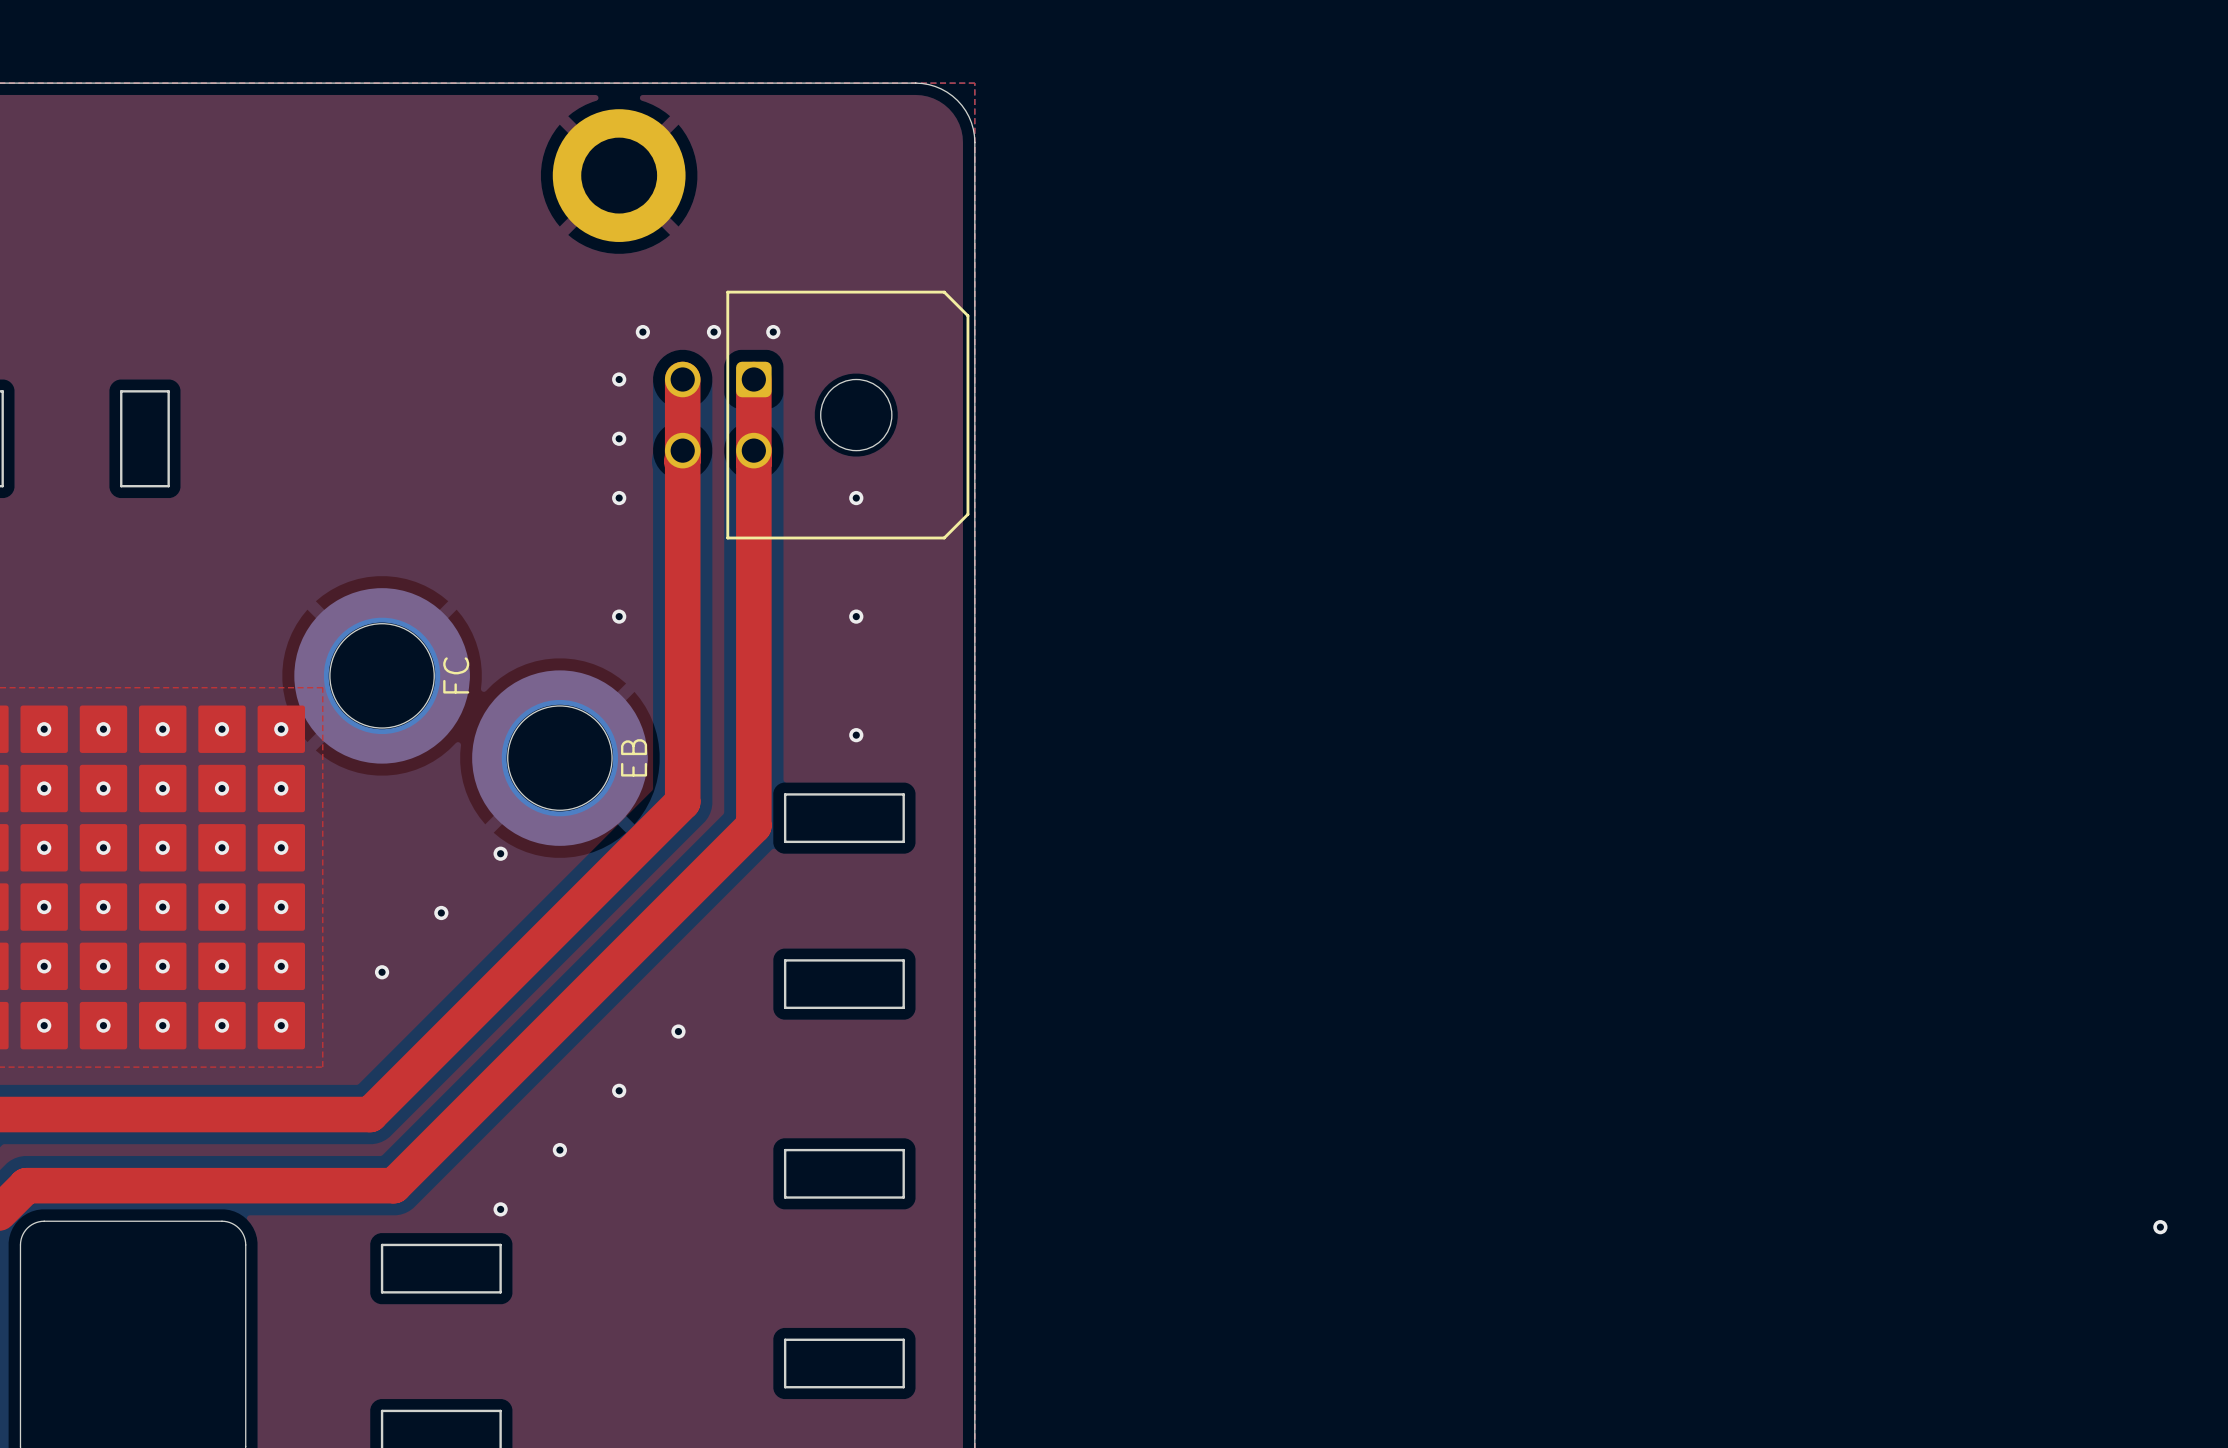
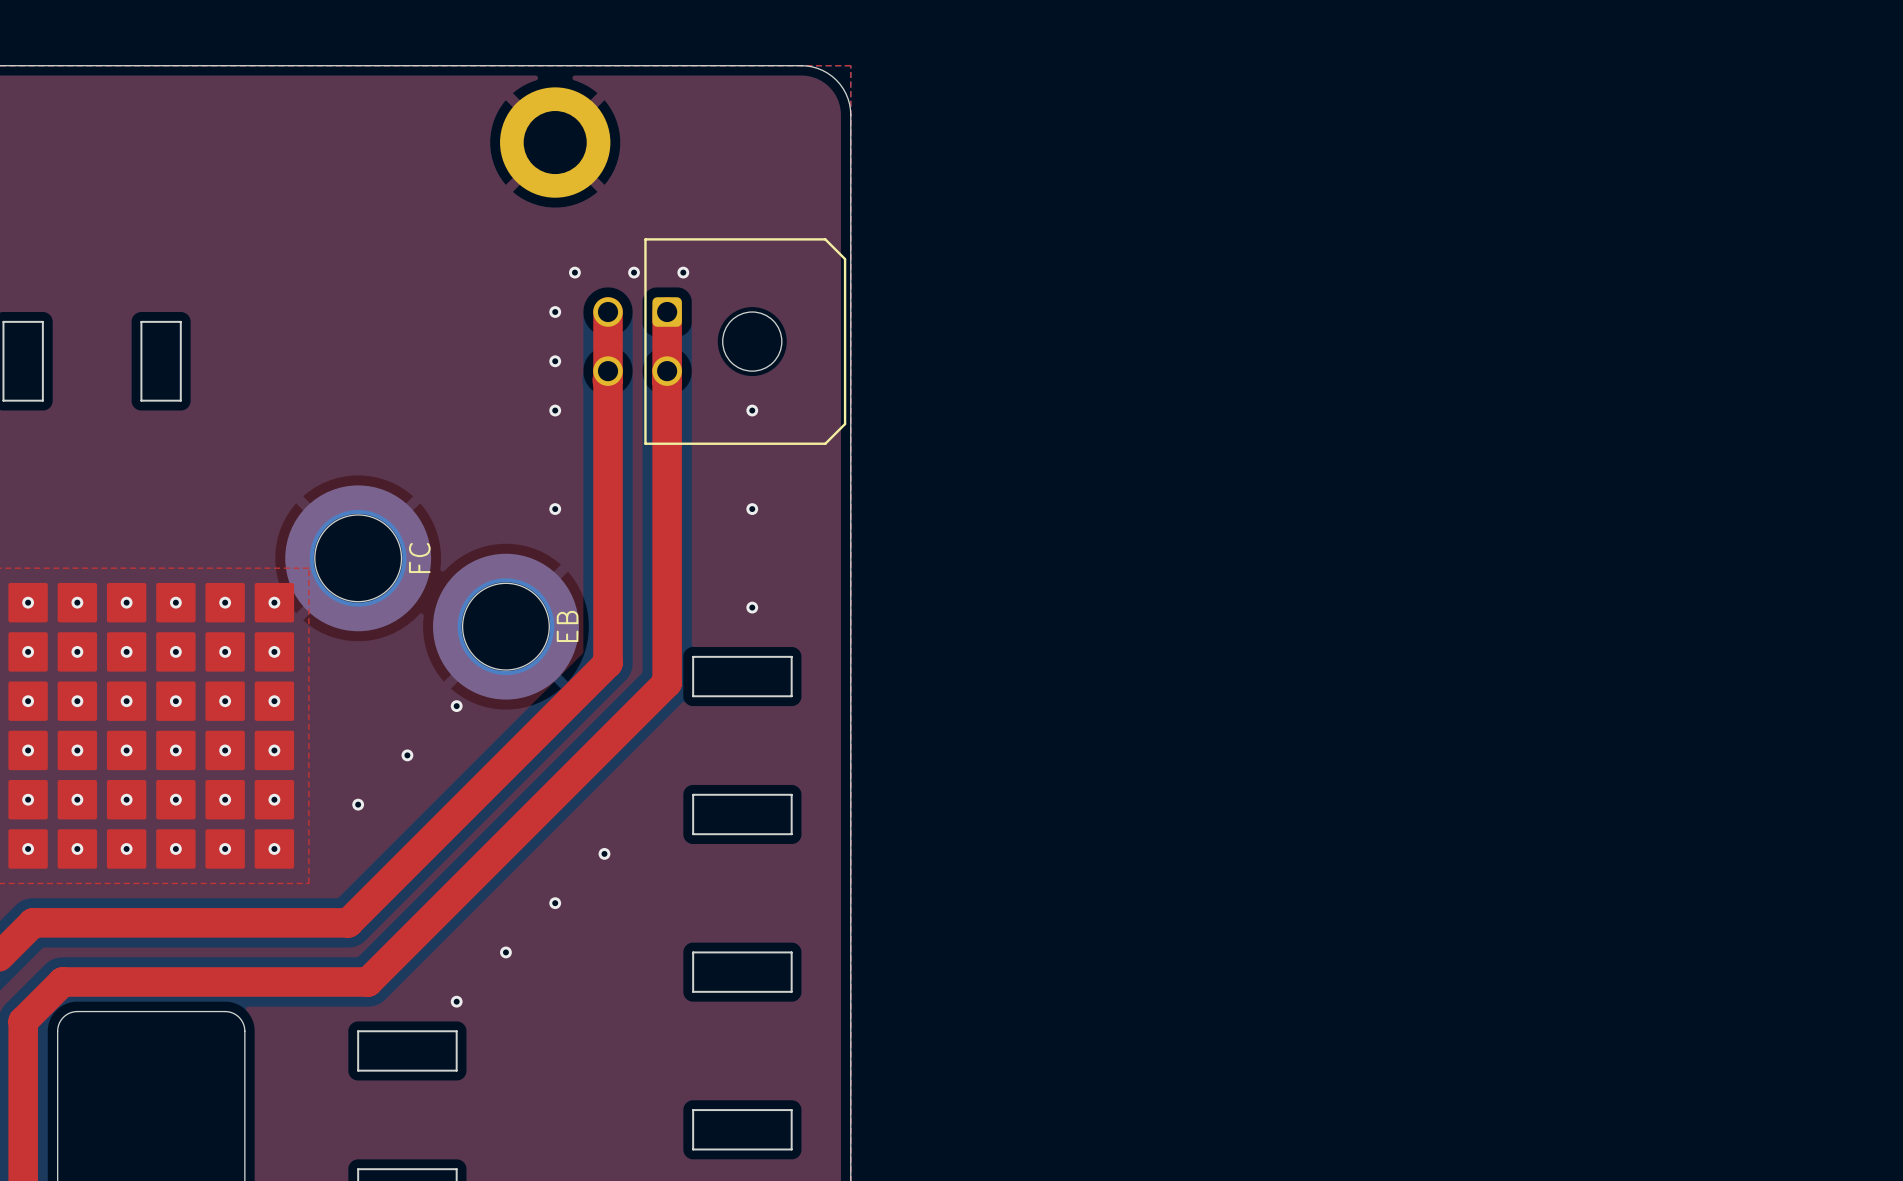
via: (2160, 1227) -> none

